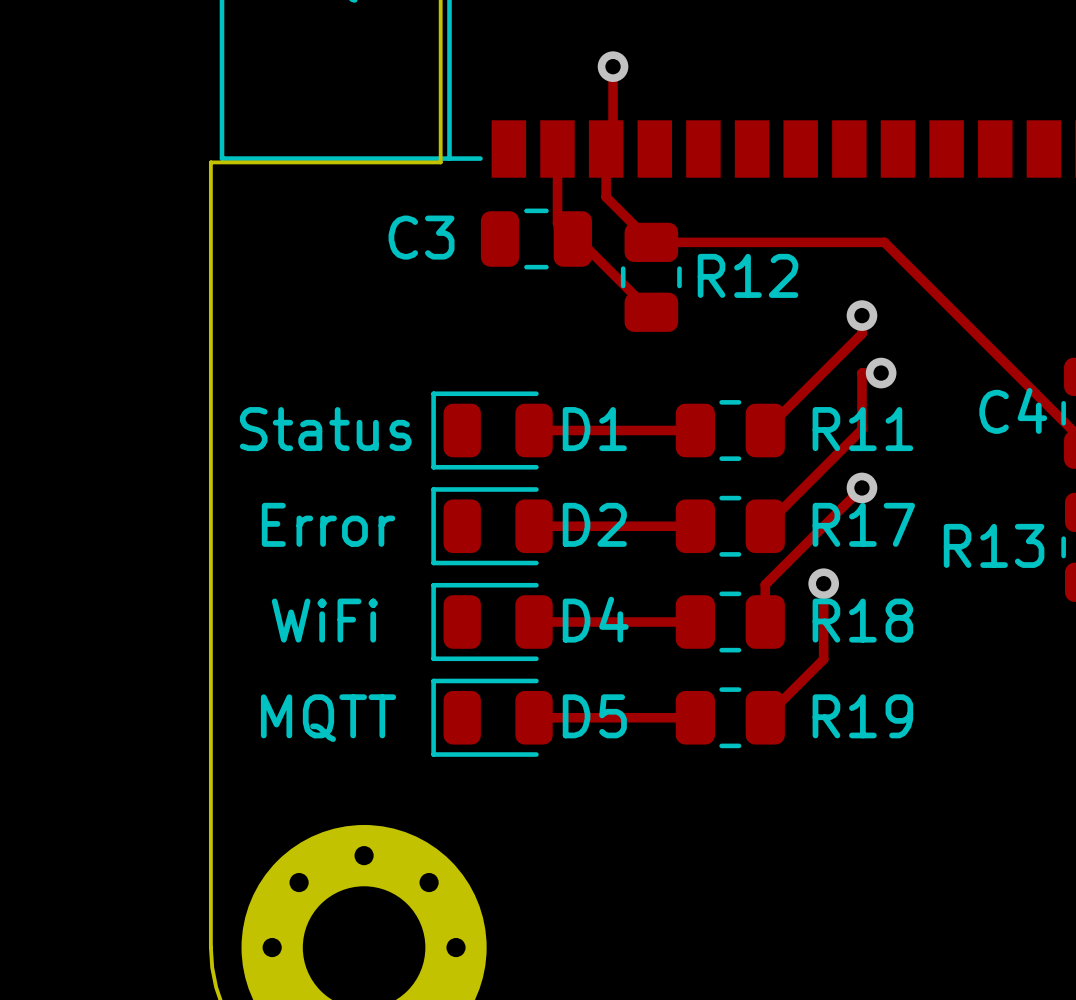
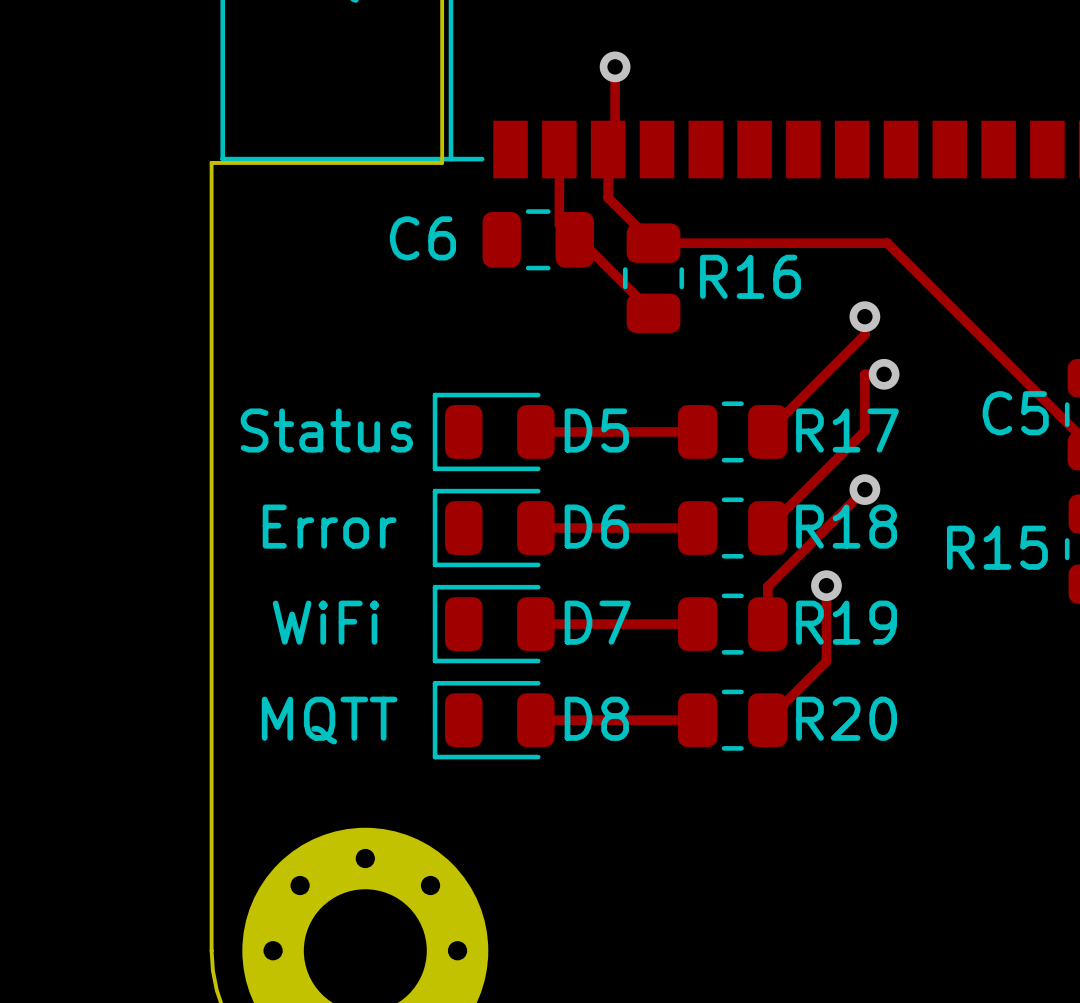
C3 name: C3 (421, 237) -> C6 (422, 238)
R12 name: R12 (747, 275) -> R16 (750, 276)
C4 name: C4 (1013, 410) -> C5 (1015, 413)
D1 name: D1 (594, 429) -> D5 (596, 430)
R11 name: R11 (862, 429) -> R17 (847, 430)
D2 name: D2 (594, 524) -> D6 (596, 526)
R17 name: R17 (863, 524) -> R18 (846, 526)
R13 name: R13 (994, 545) -> R15 (997, 547)
D4 name: D4 (595, 619) -> D7 (597, 622)
R18 name: R18 (862, 620) -> R19 (846, 622)
D5 name: D5 (594, 716) -> D8 (596, 718)
R19 name: R19 (862, 716) -> R20 (846, 718)

